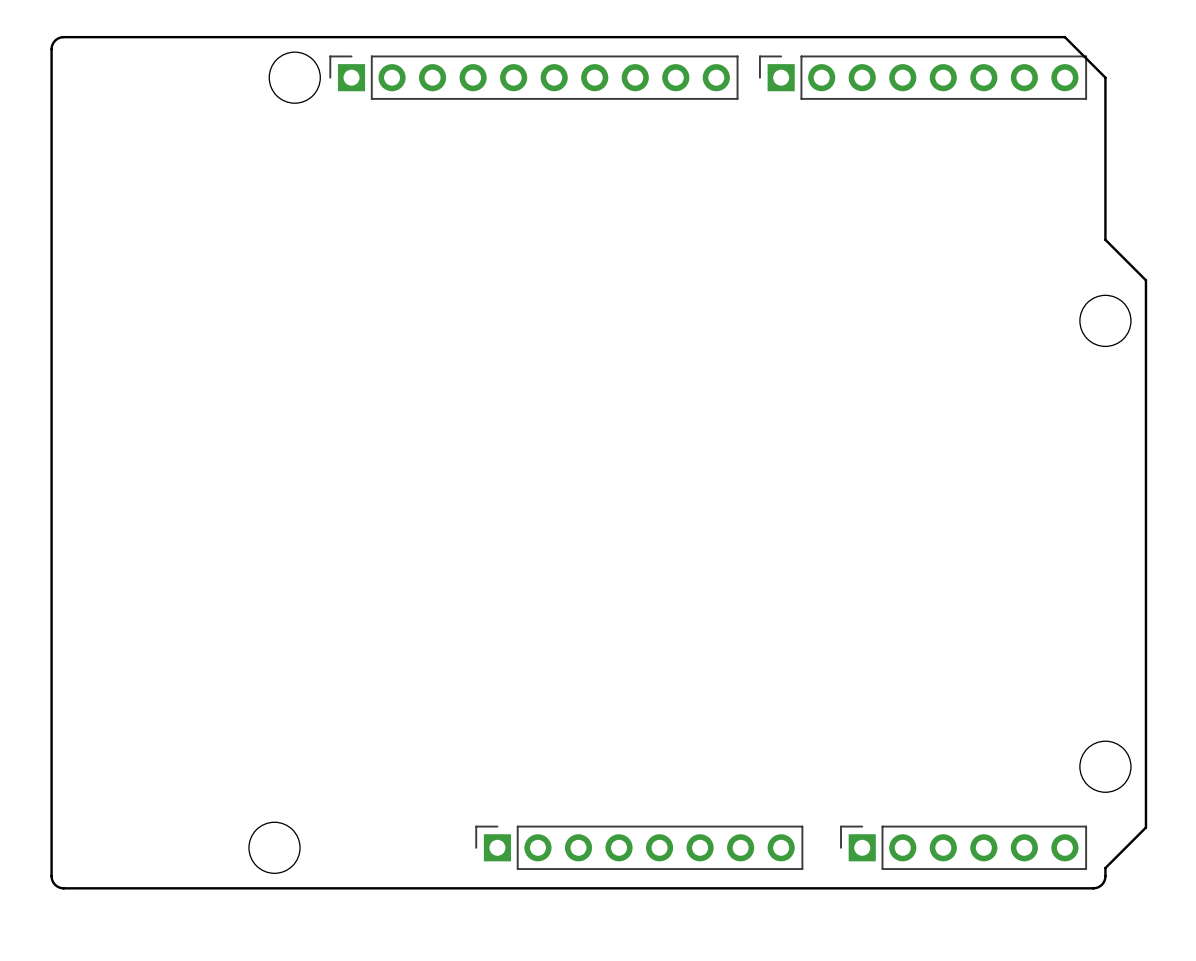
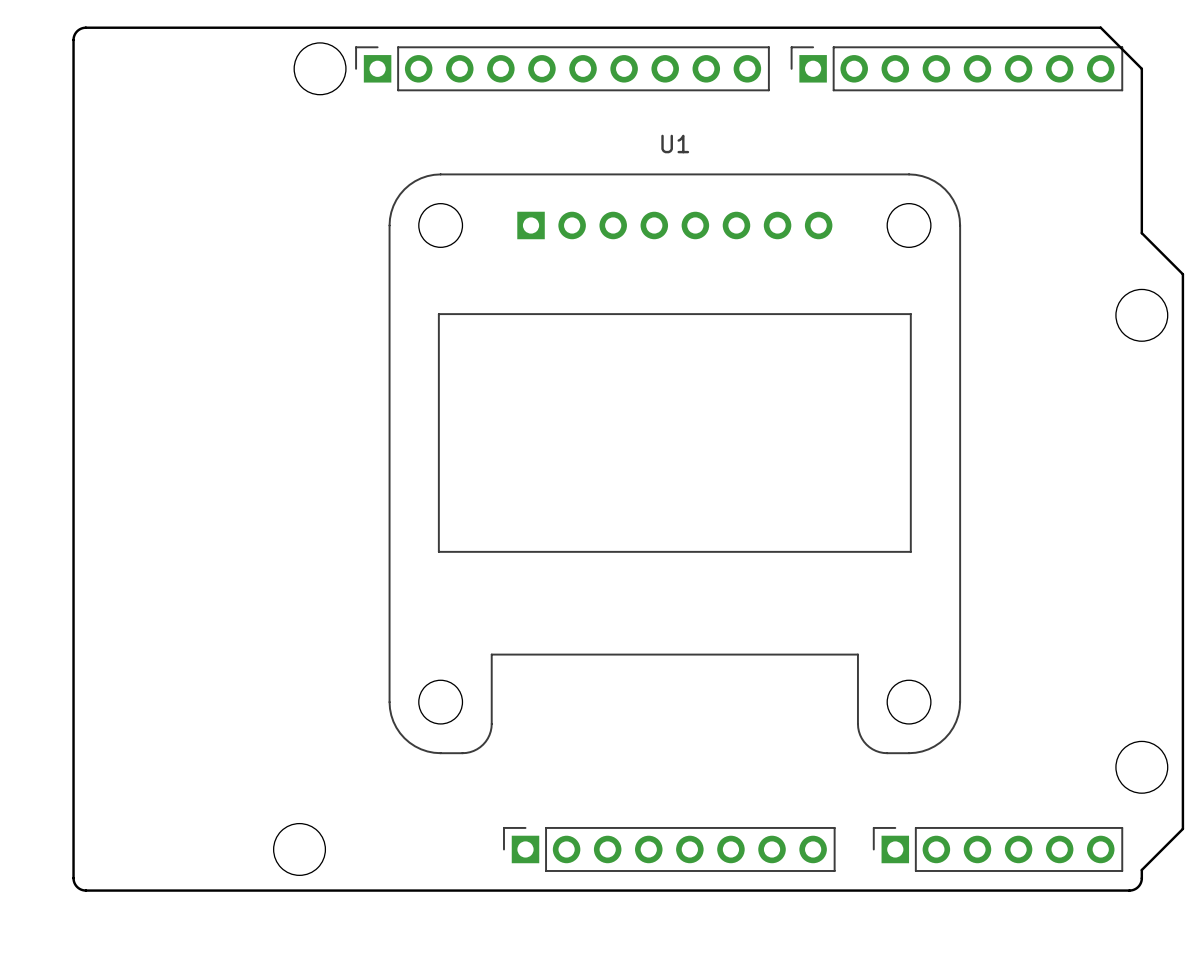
U1: none -> (674, 463)

